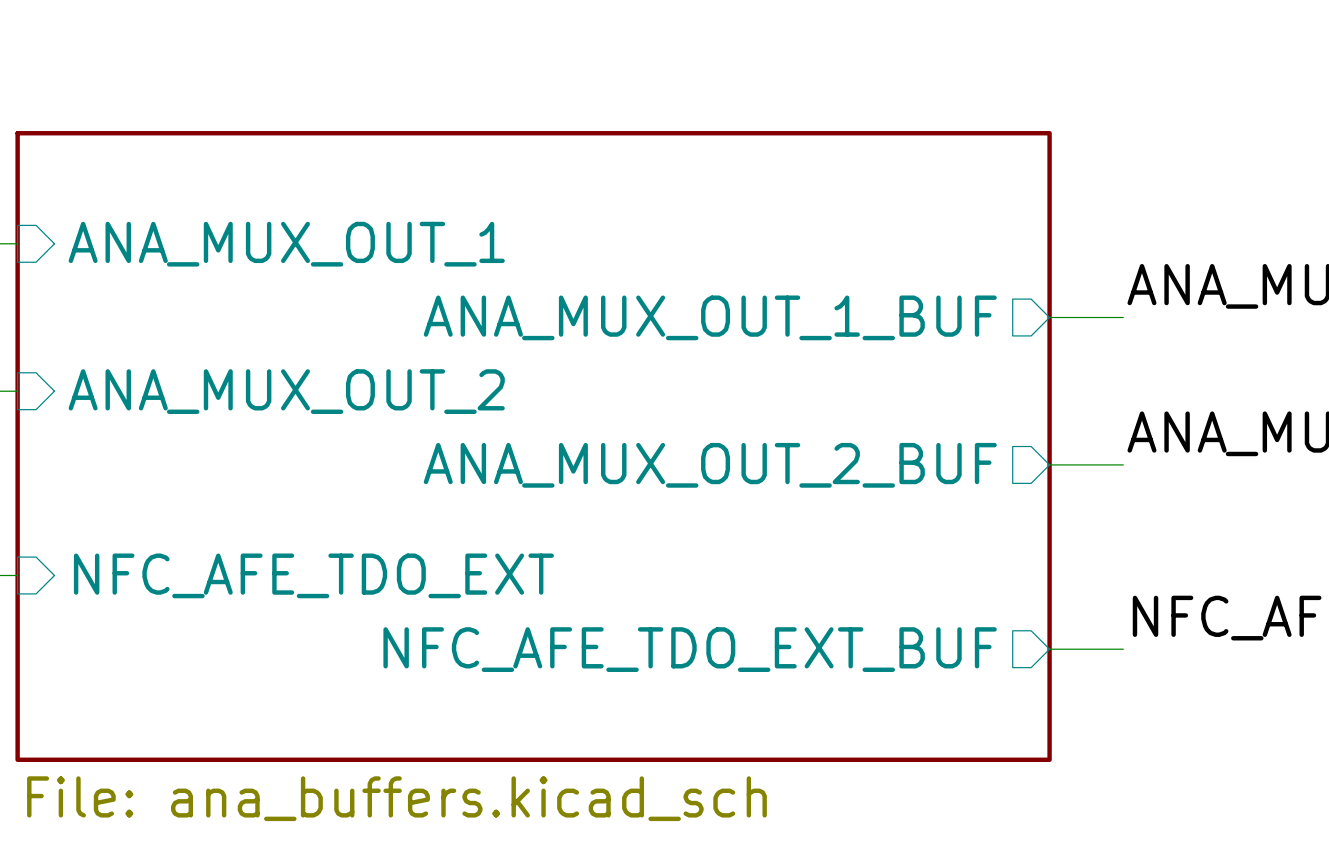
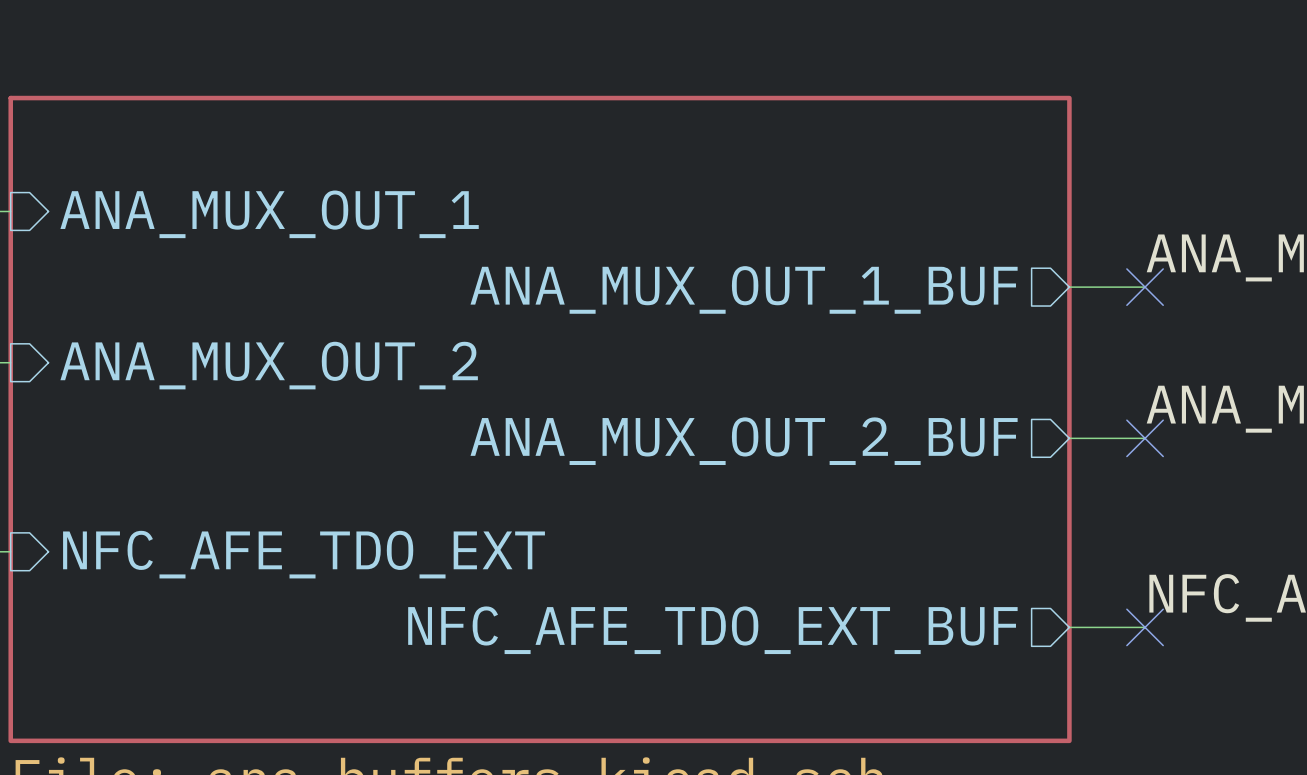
no-connect mark: none -> (1145, 287)
no-connect mark: none -> (1145, 438)
no-connect mark: none -> (1145, 627)

